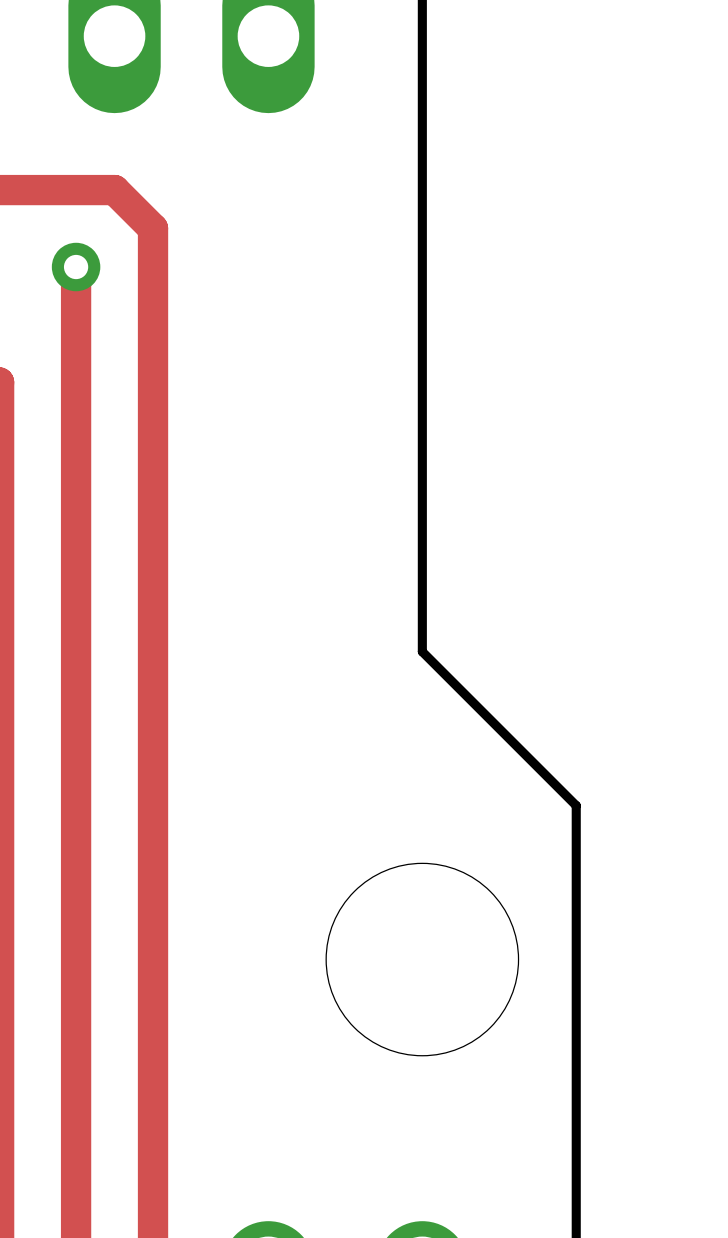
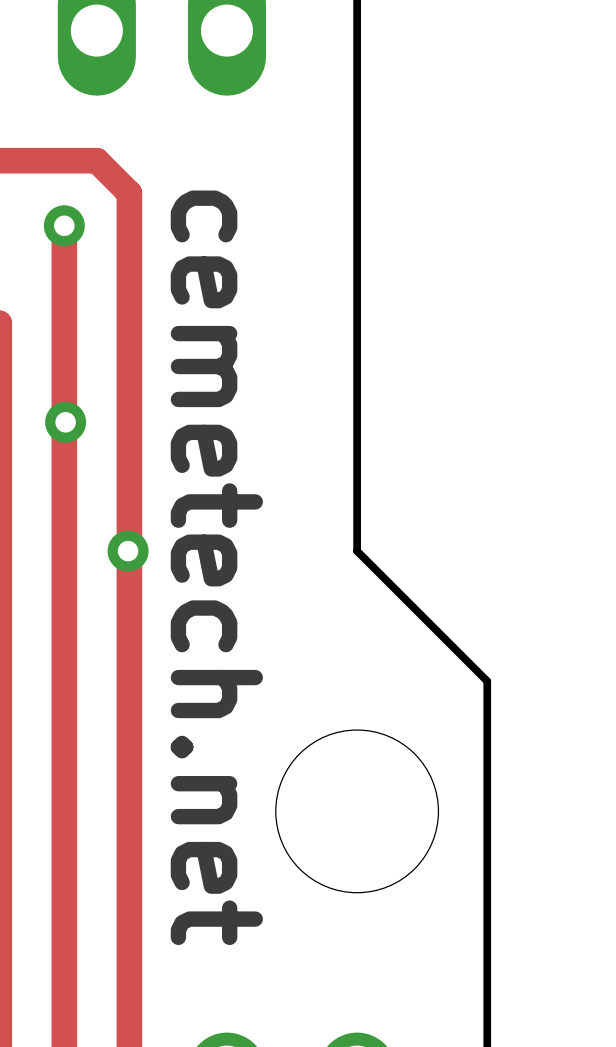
via: none -> (65, 422)
via: none -> (128, 551)
text: none -> cemetech.net (216, 567)

